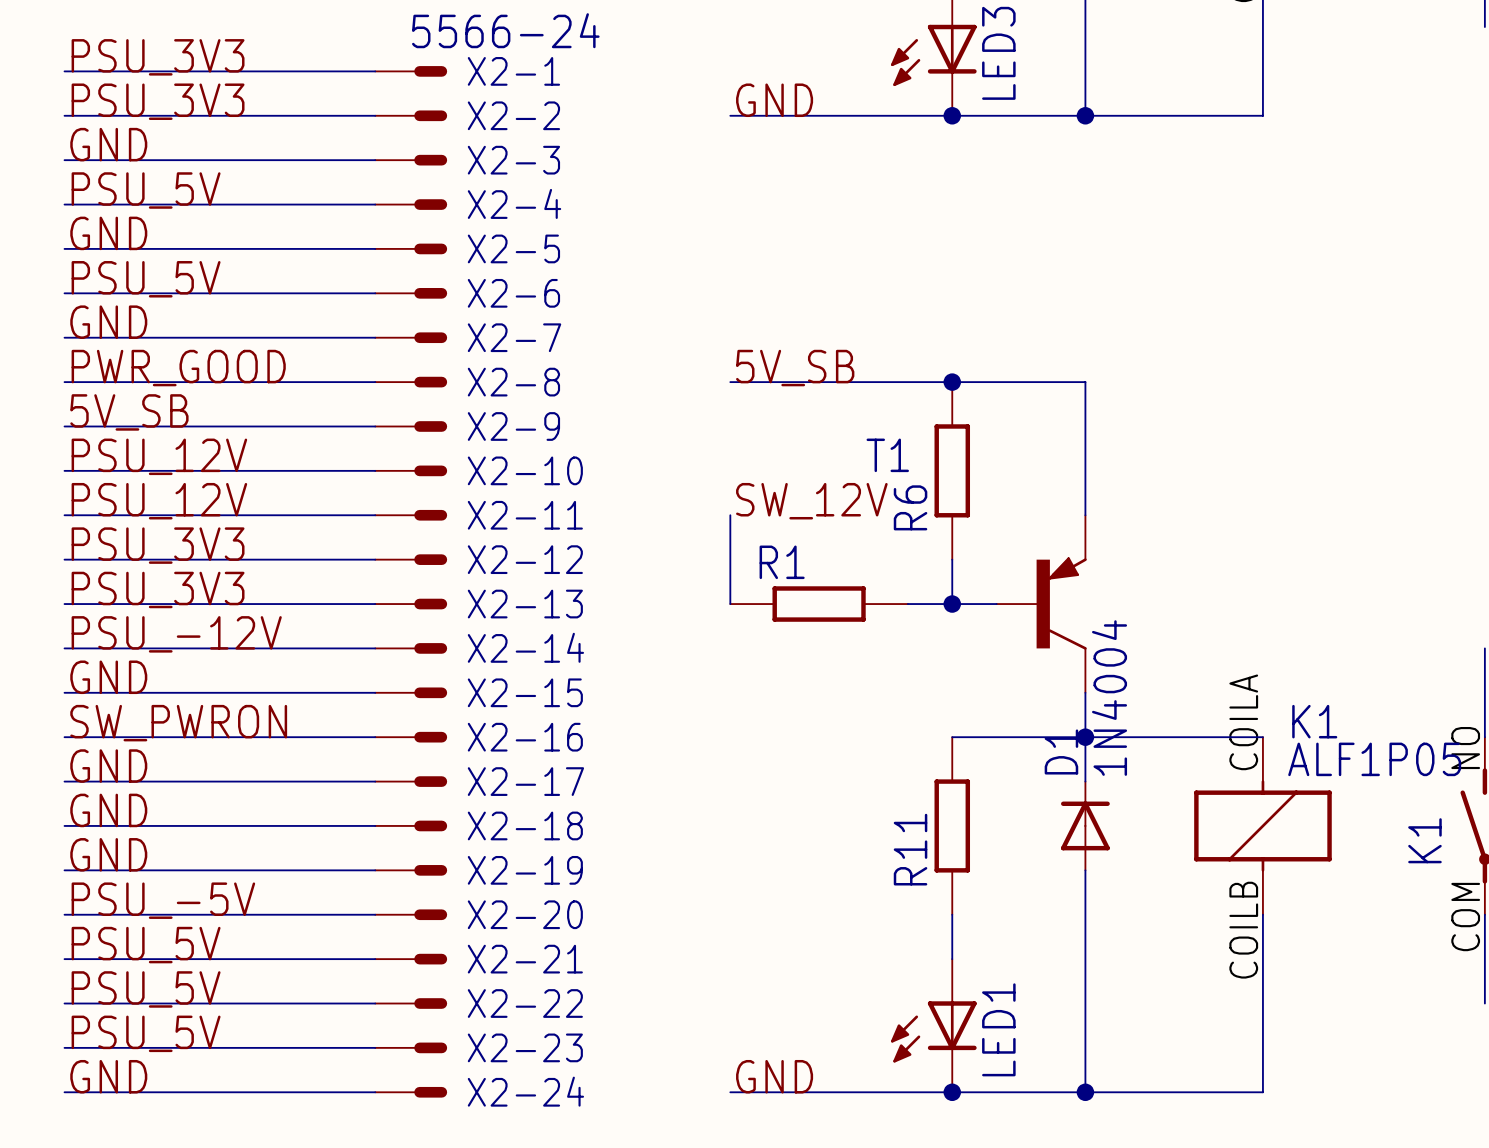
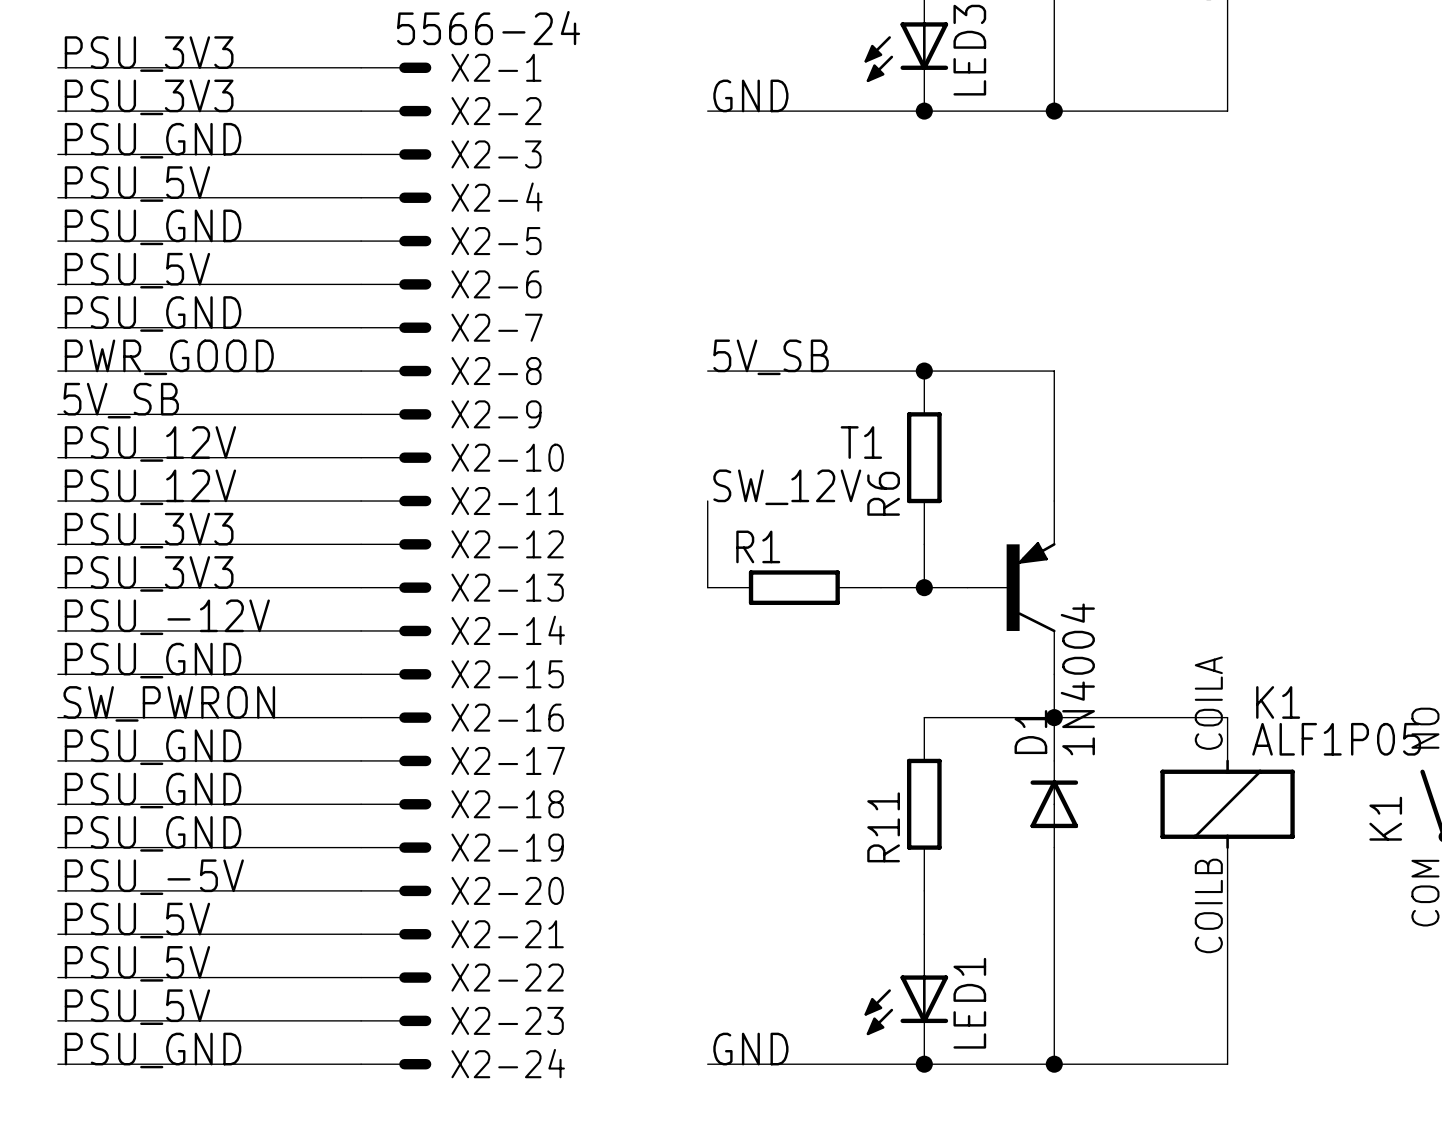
label: GND (108, 144) -> PSU_GND (153, 140)
label: GND (108, 233) -> PSU_GND (153, 227)
label: GND (108, 322) -> PSU_GND (153, 314)
label: GND (108, 677) -> PSU_GND (153, 660)
label: GND (108, 766) -> PSU_GND (153, 747)
label: GND (108, 810) -> PSU_GND (153, 790)
label: GND (108, 854) -> PSU_GND (153, 833)
label: GND (108, 1076) -> PSU_GND (153, 1050)

